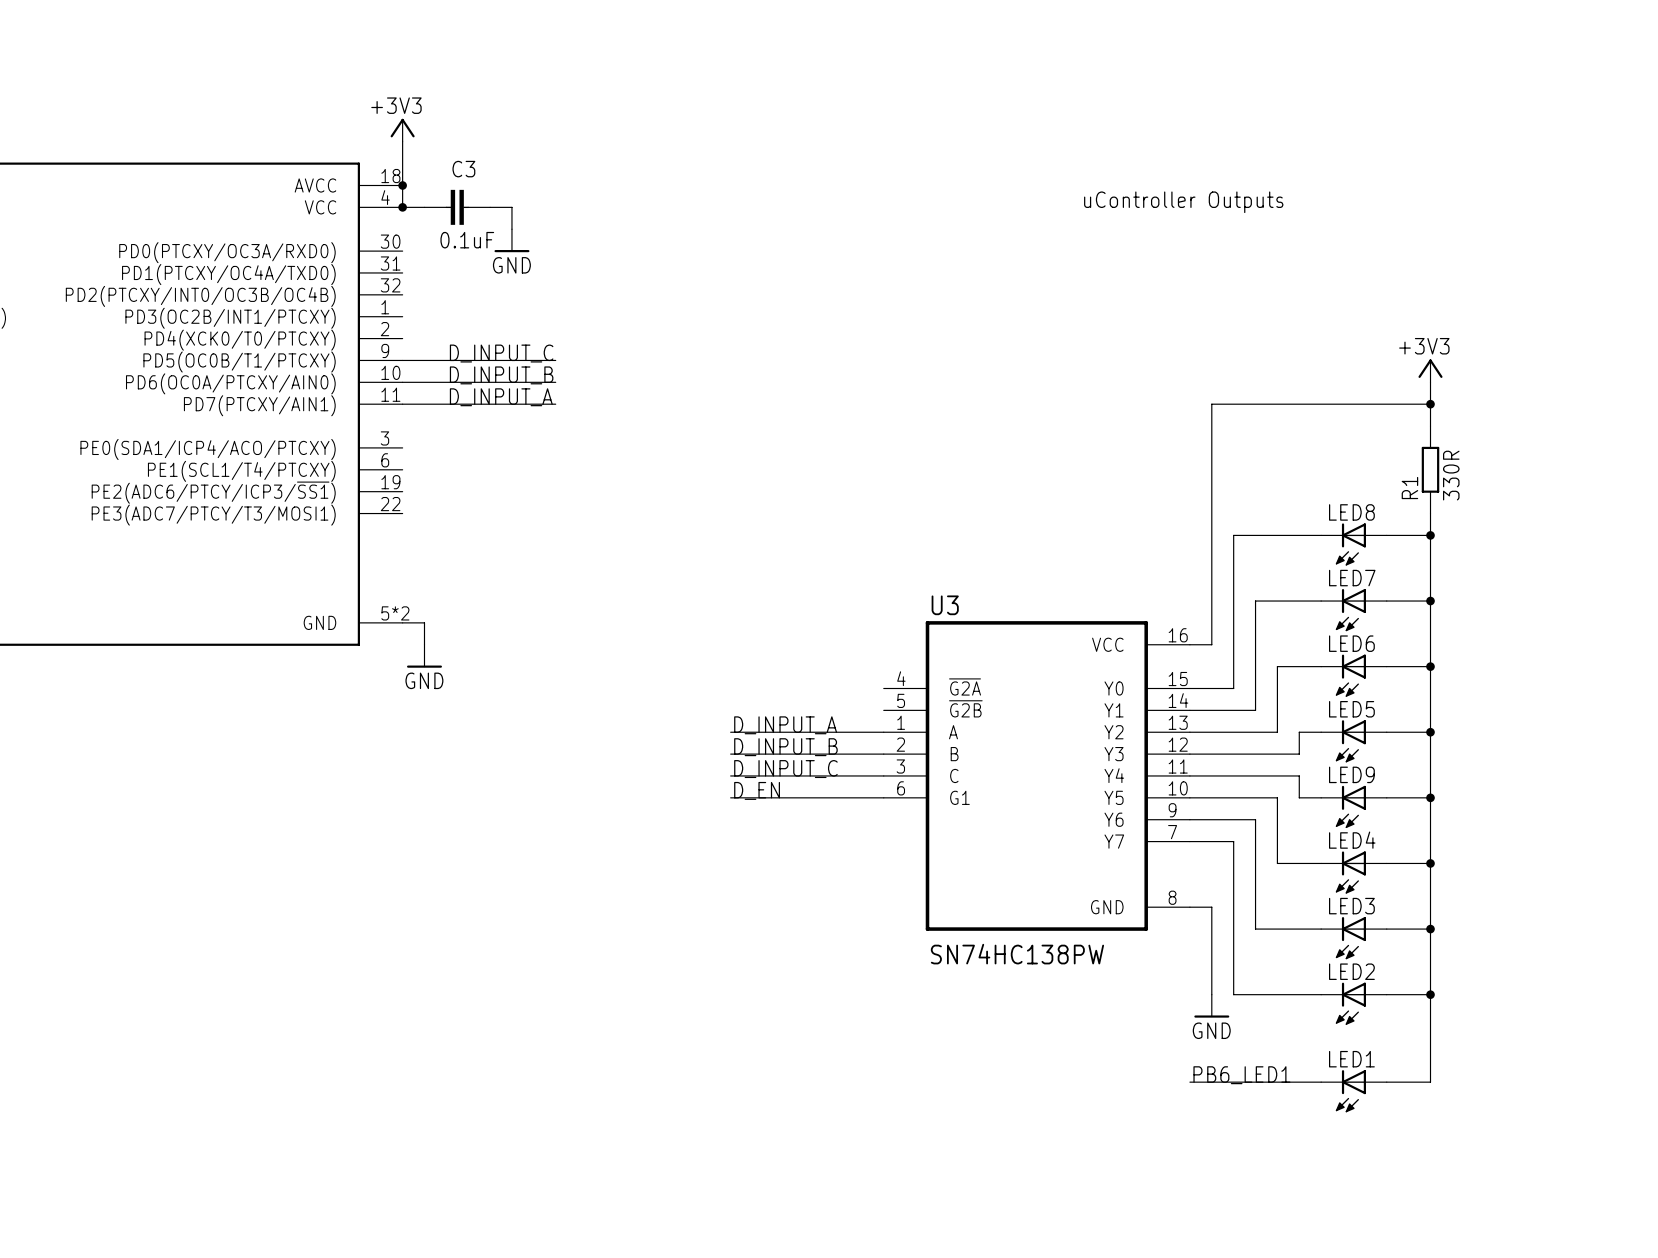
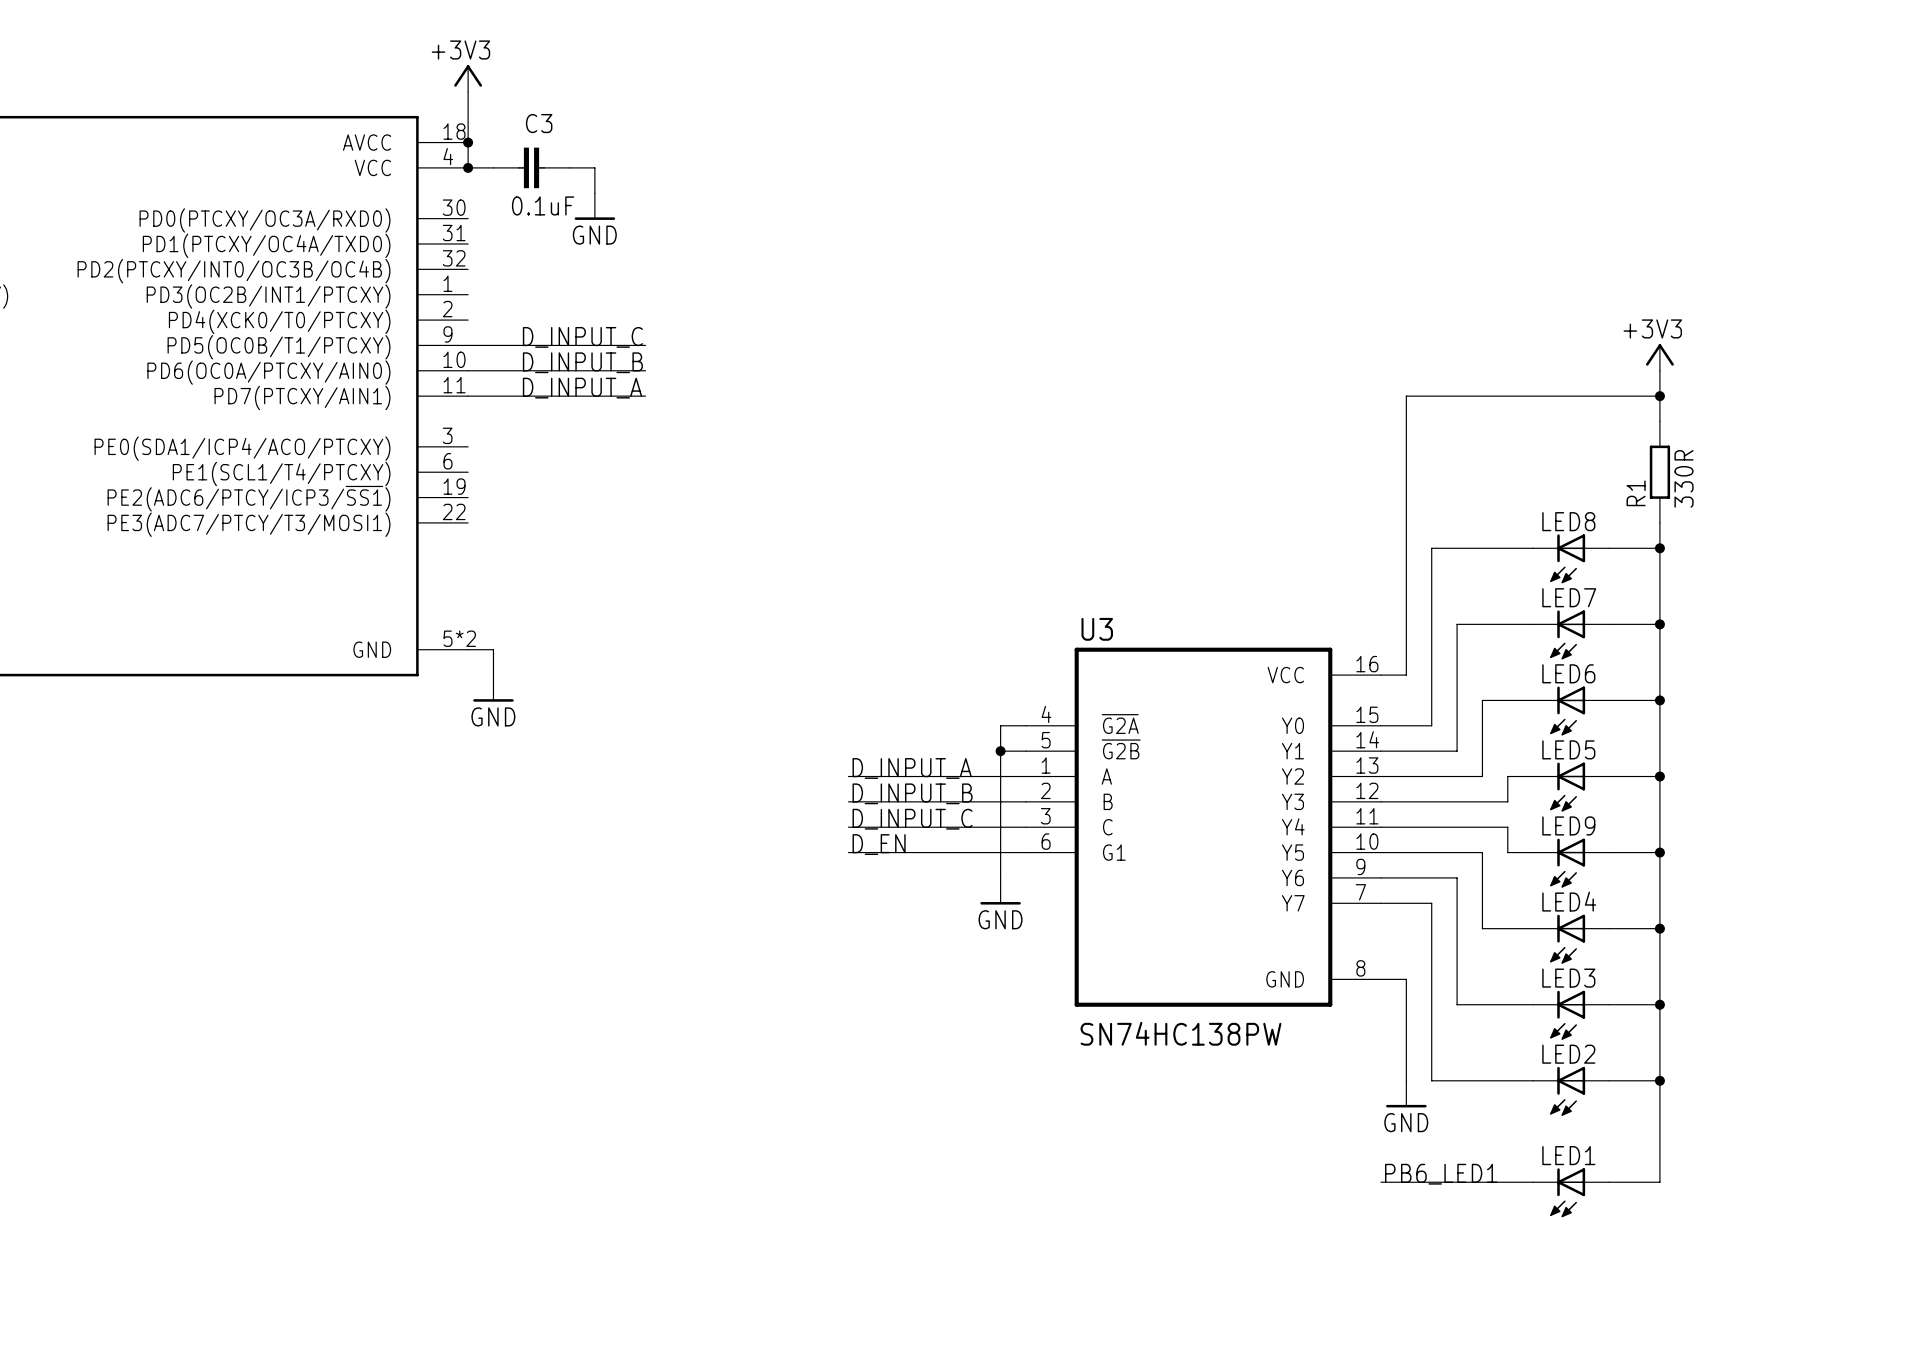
text: uController Outputs (1183, 202) -> none
wire: none -> (1025, 725) (1000, 725) (1000, 877)
wire: none -> (1000, 751) (1025, 751)
junction: none -> (1000, 751)
power symbol: none -> GND (1000, 891)

